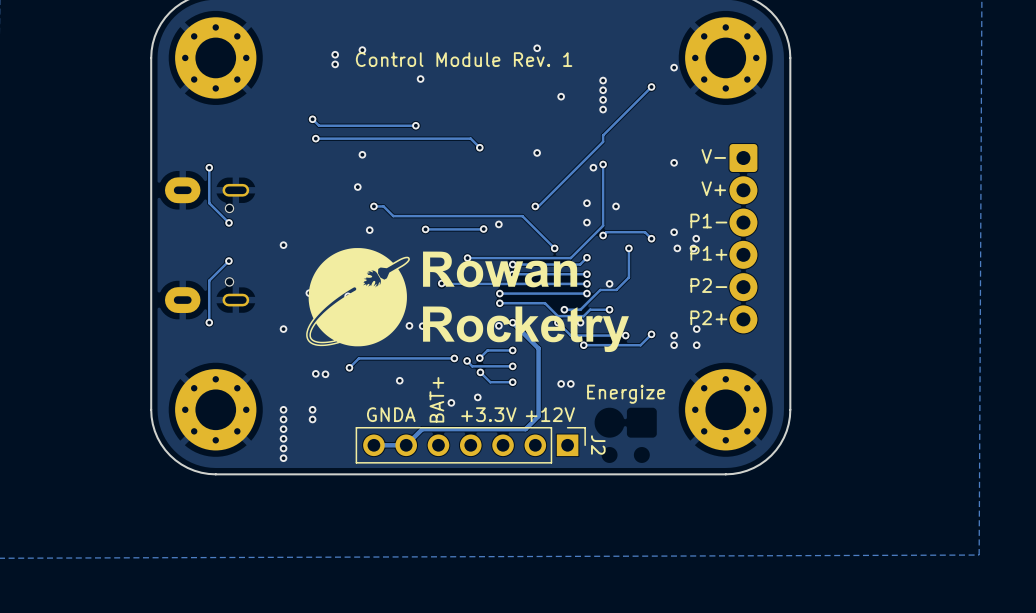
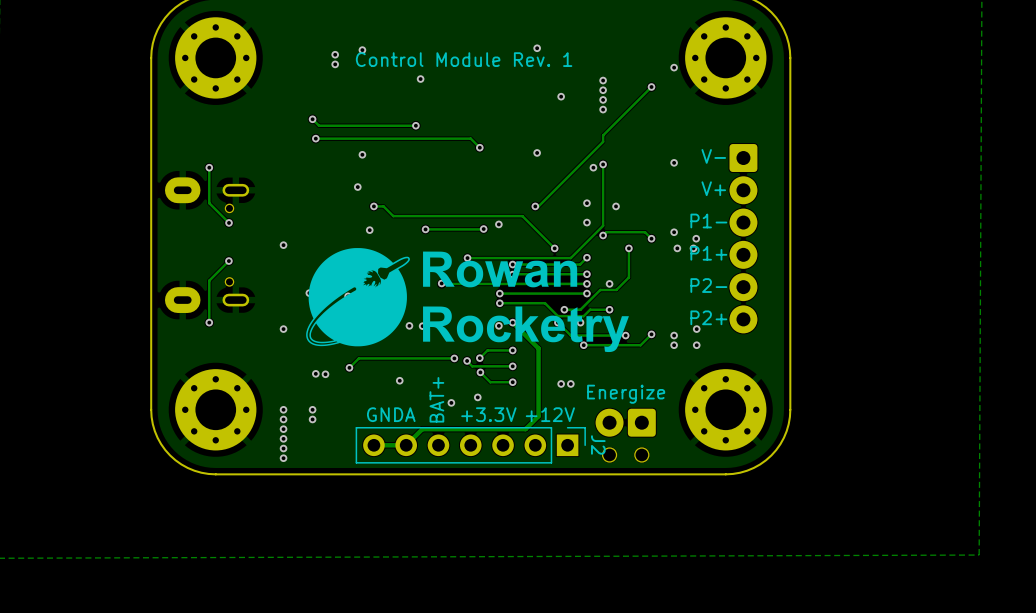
part: none -> (625, 435)

